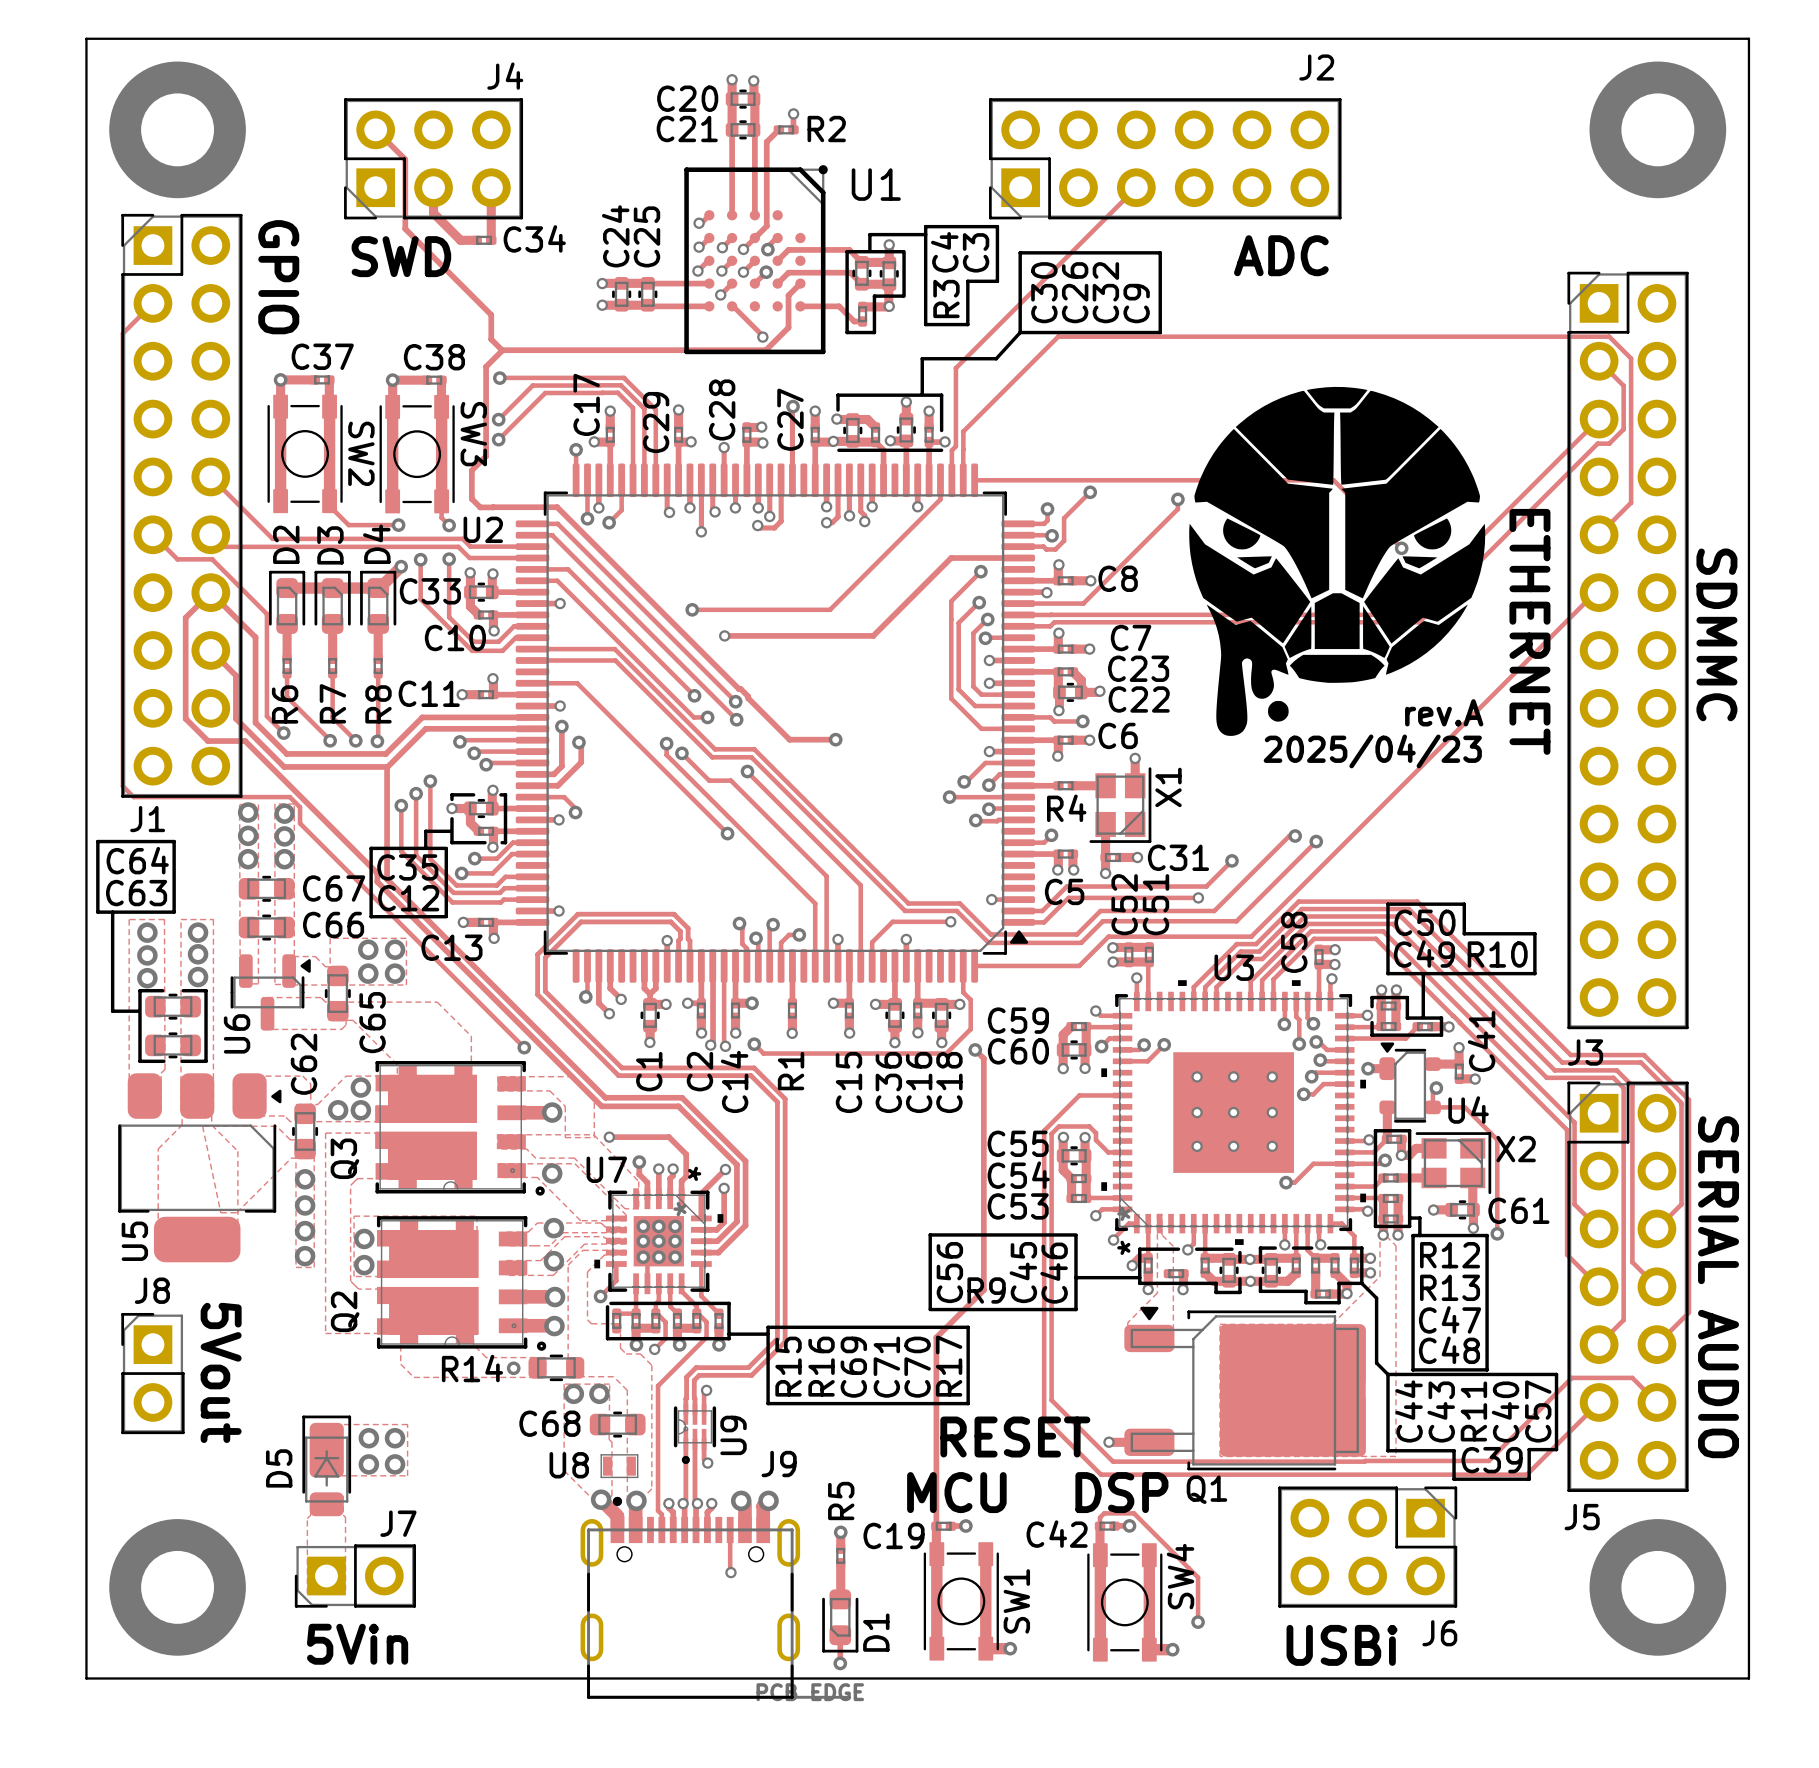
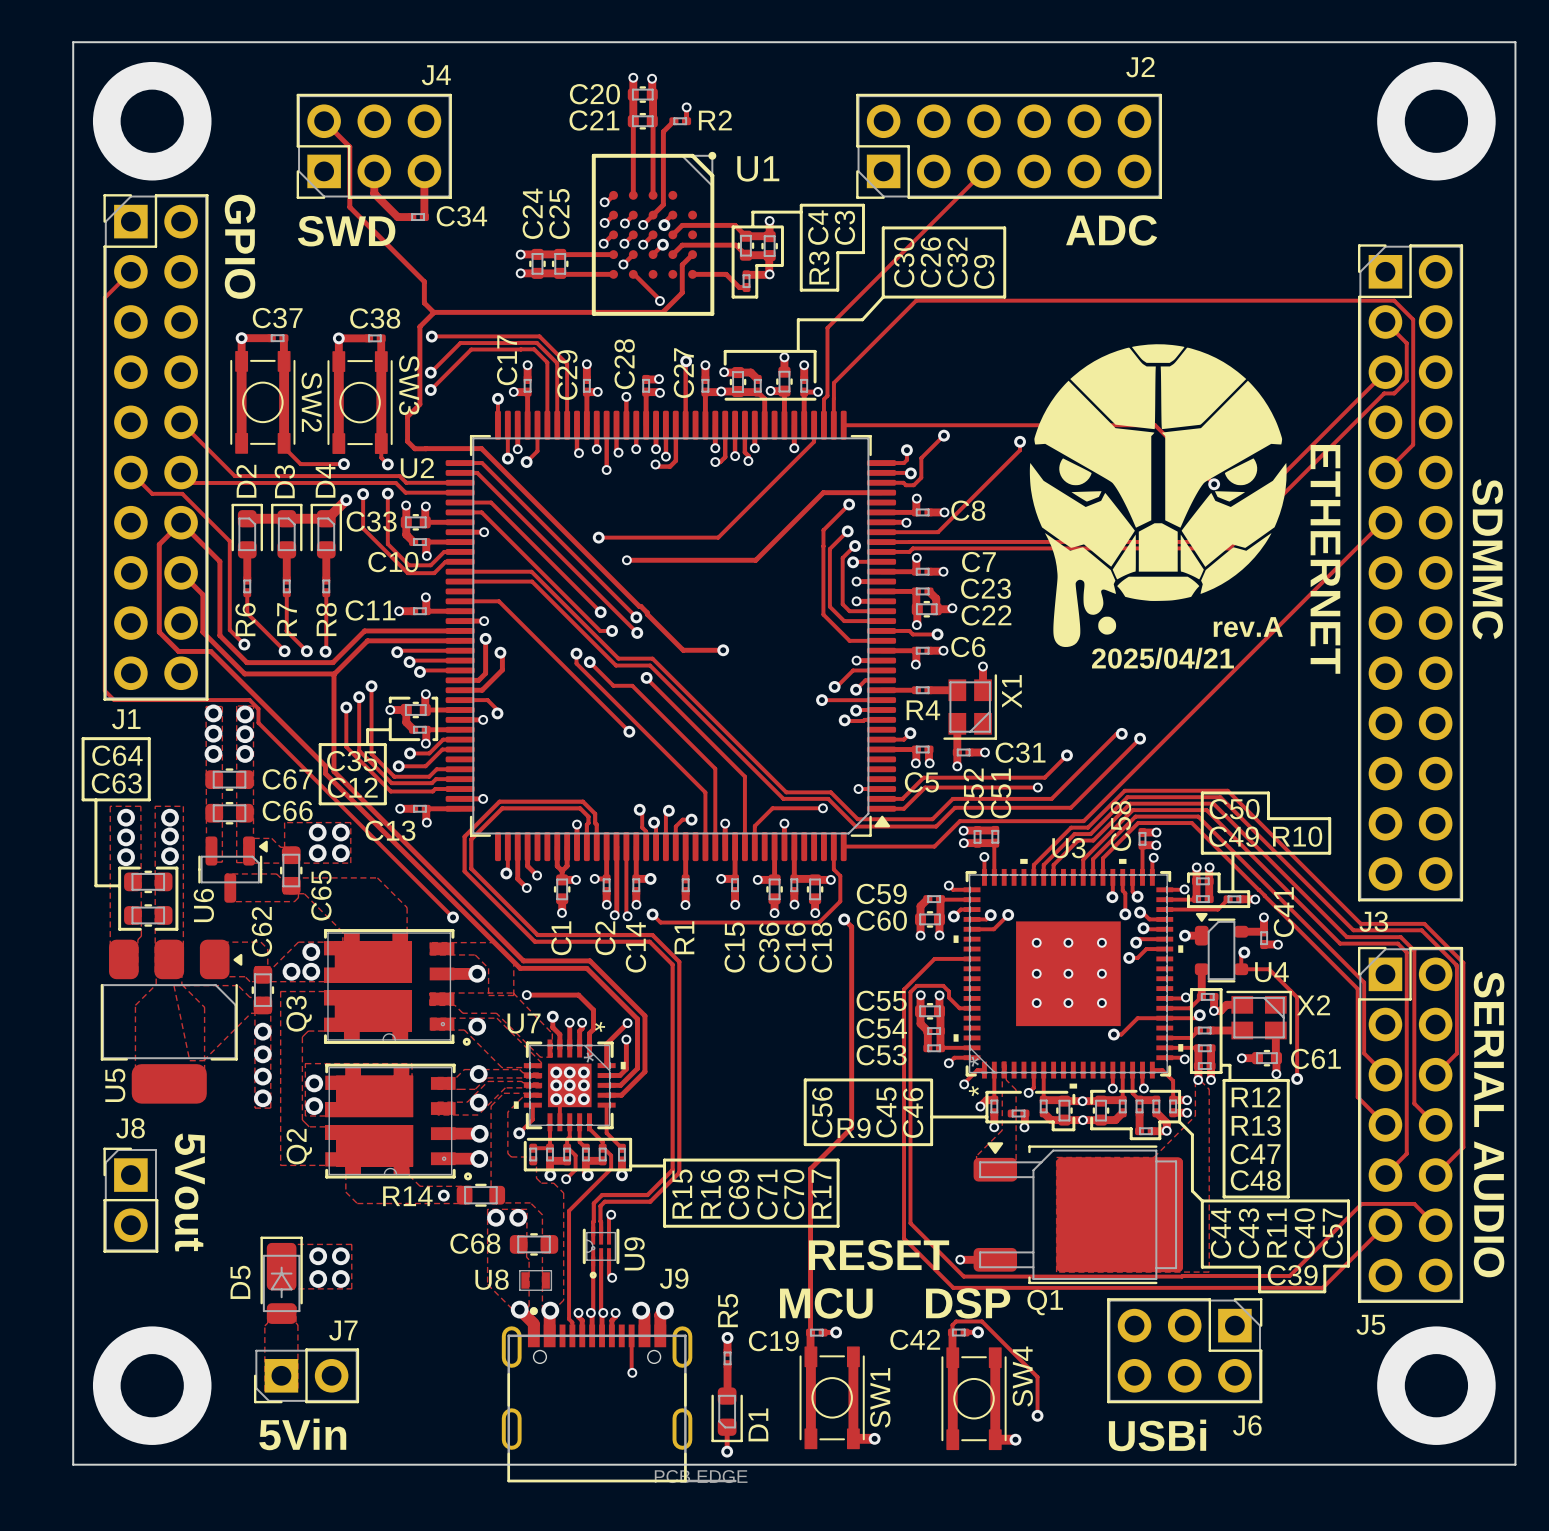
text: 2025/04/23 (1372, 751) -> 2025/04/21 (1162, 658)

